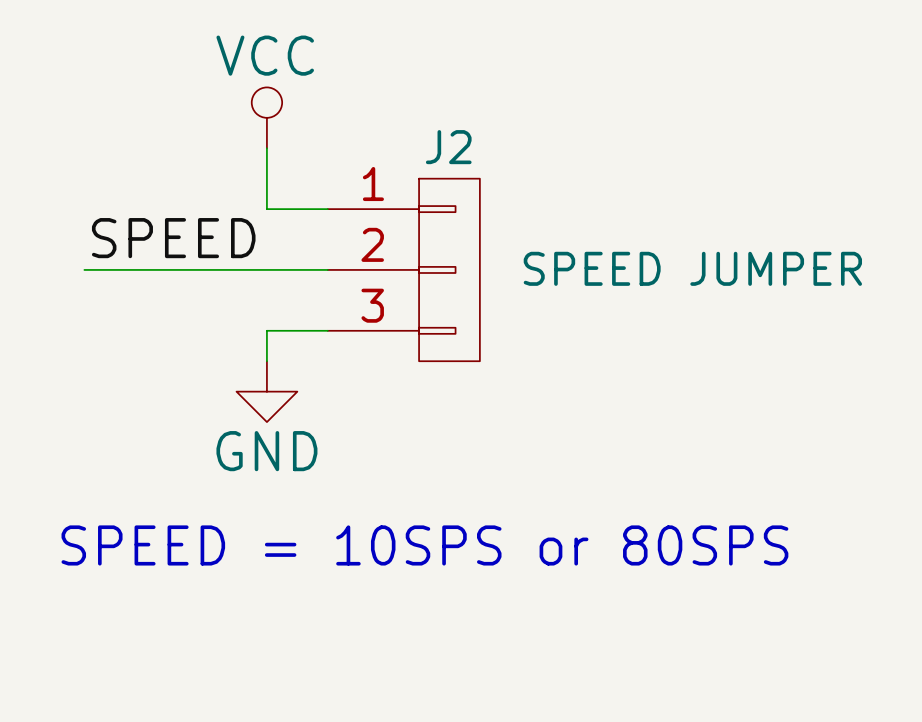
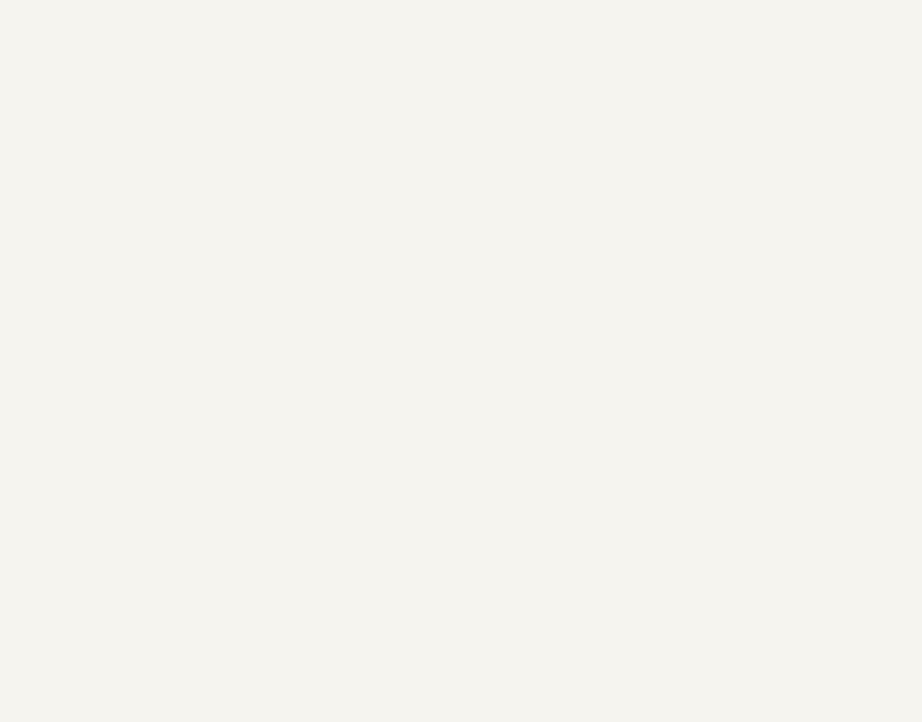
power symbol: VCC (266, 117) -> none
wire: (266, 148) (266, 209) (327, 209) -> none
label: SPEED (173, 238) -> none
wire: (84, 269) (327, 269) -> none
J2: SPEED JUMPER (403, 269) -> none
wire: (327, 330) (266, 330) (266, 361) -> none
power symbol: GND (266, 391) -> none
text: SPEED = 10SPS or 80SPS (424, 545) -> none

